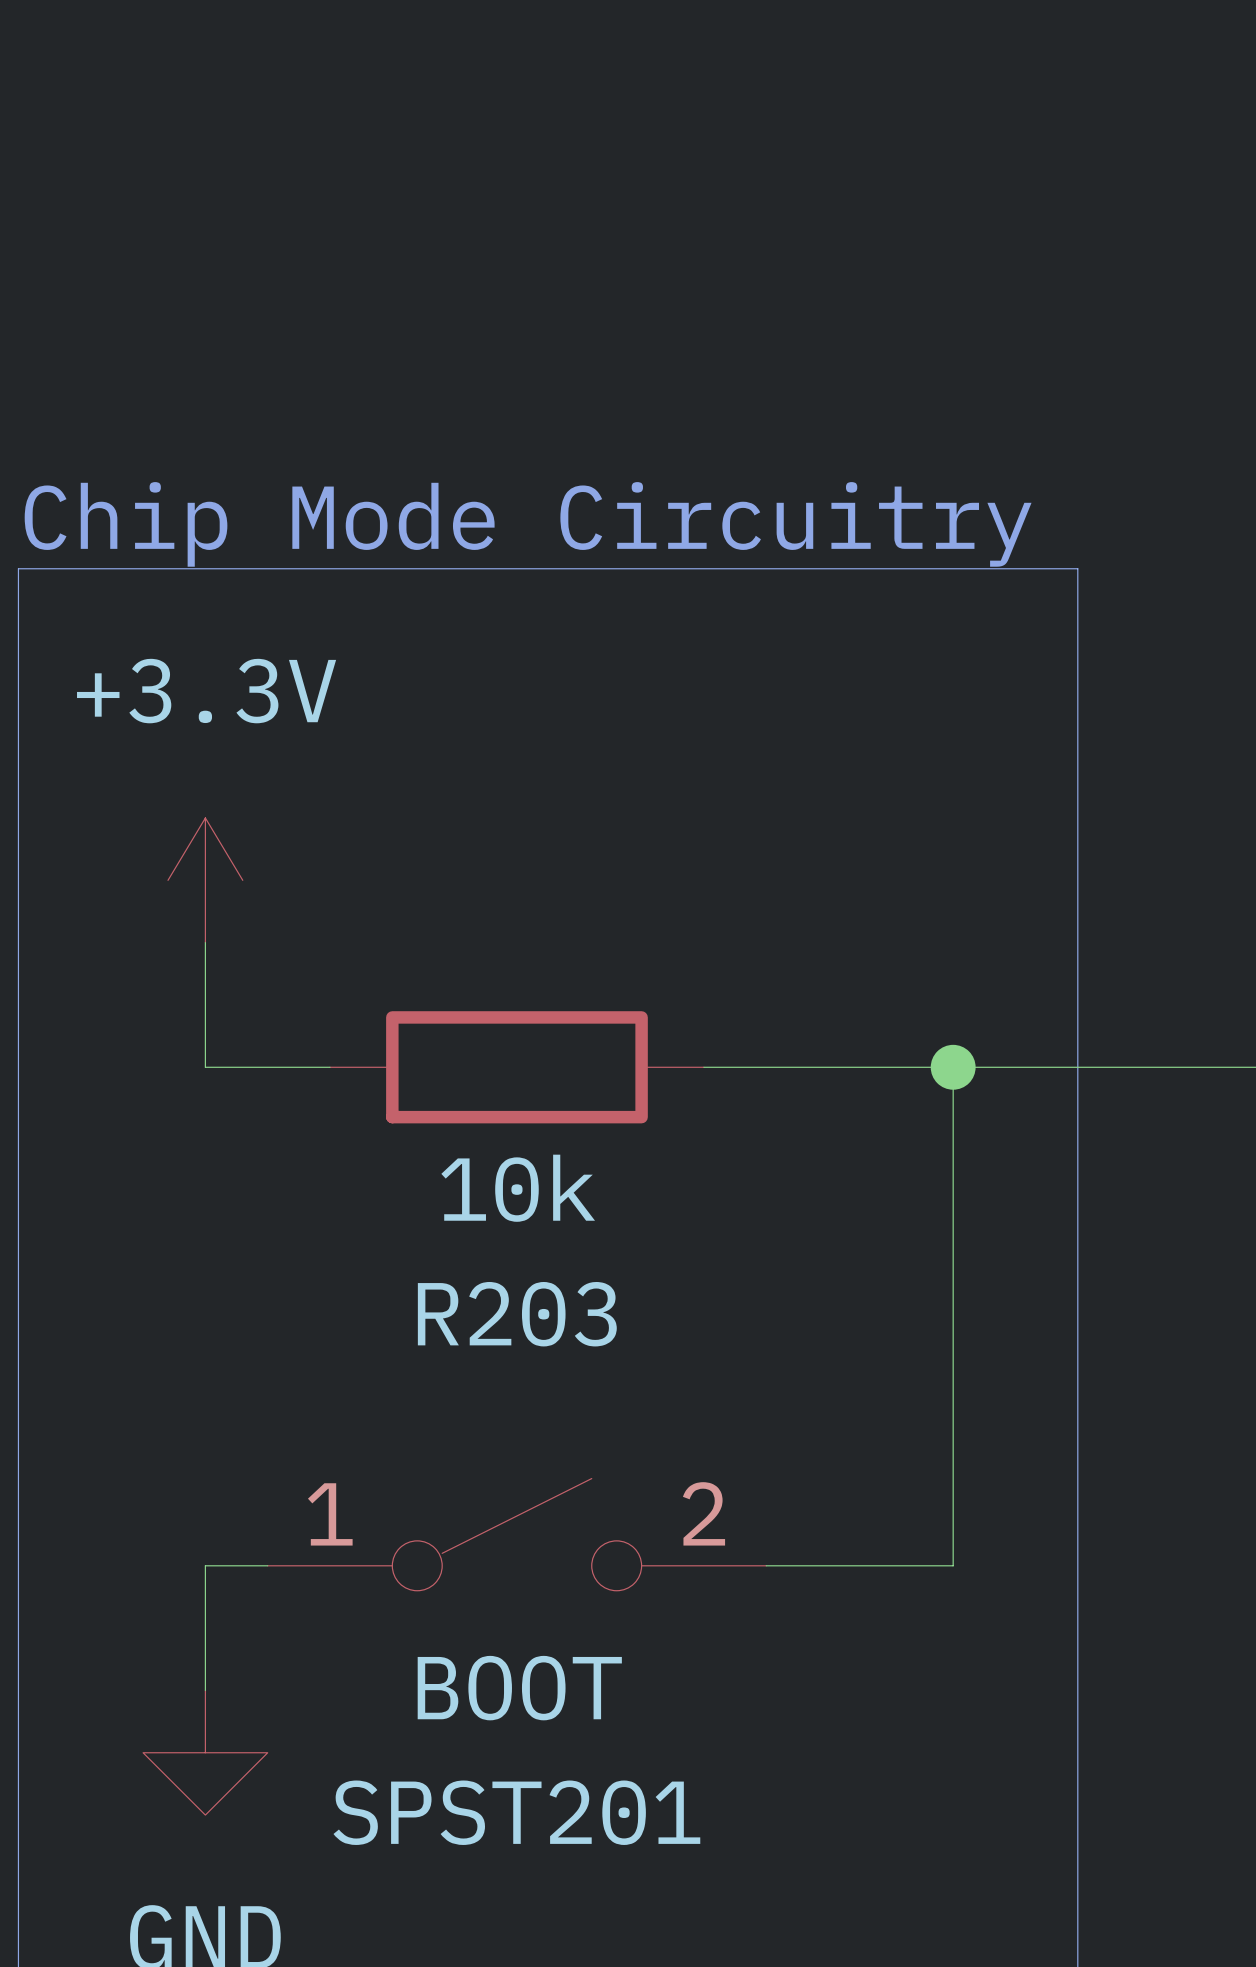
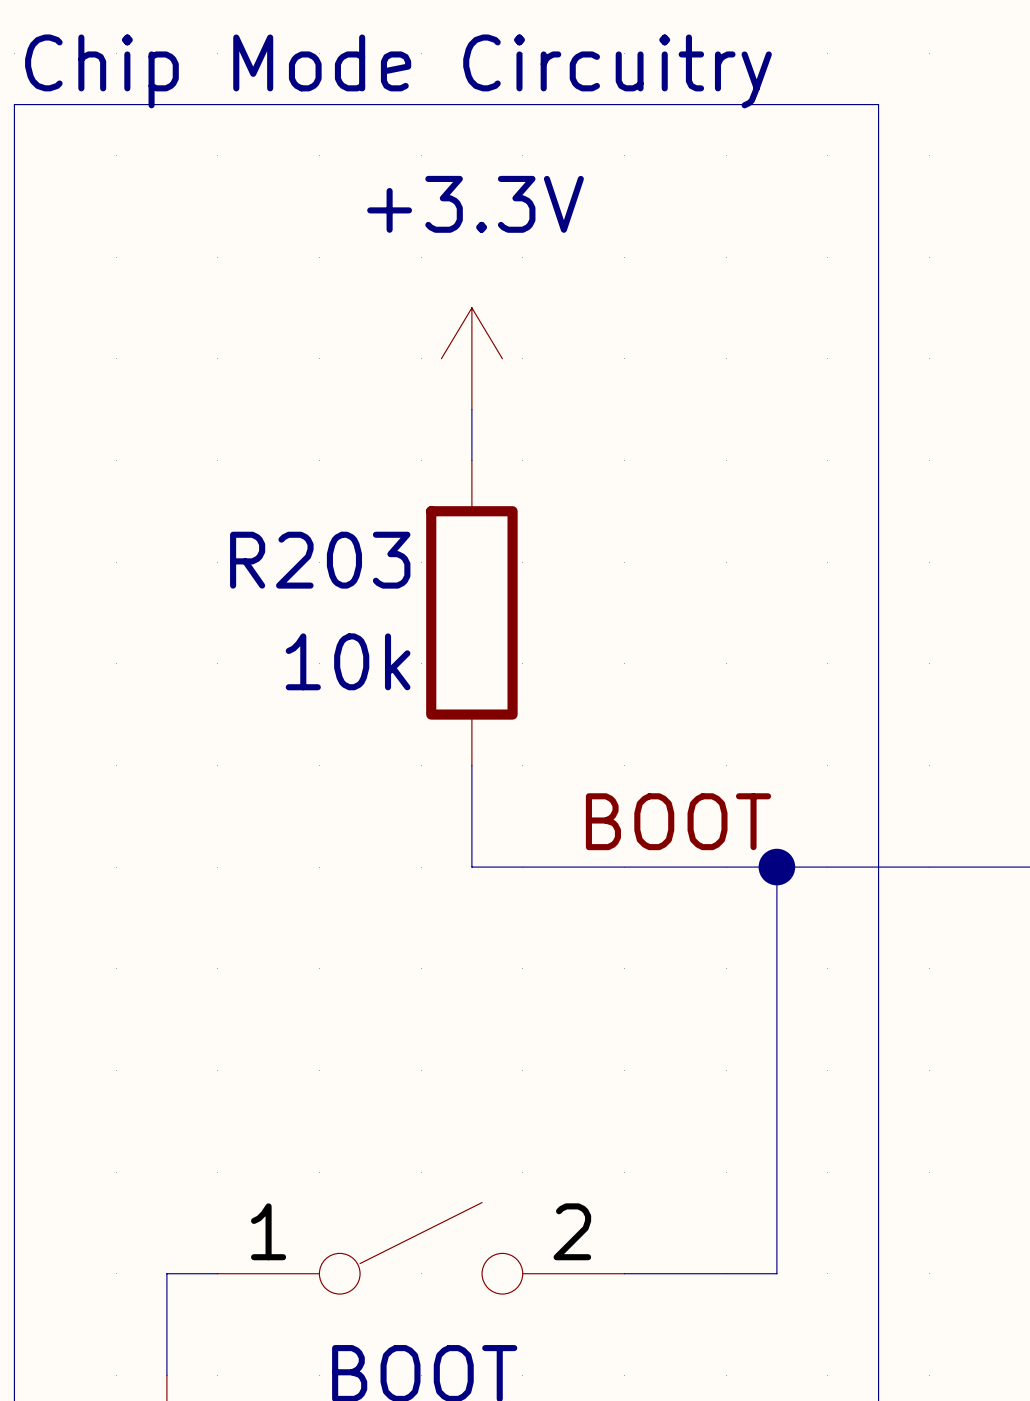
wire: none -> (471, 409) (471, 460)
text position: Chip Mode Circuitry (528, 524) -> Chip Mode Circuitry (398, 71)
line: (18, 568) (1077, 568) -> (14, 460) (14, 104) (878, 104) (878, 460)
power symbol position: +3.3V (205, 880) -> +3.3V (471, 358)
wire: (205, 942) (205, 1067) (330, 1067) -> (471, 765) (471, 867) (573, 867)
label: none -> BOOT (678, 821)
R203 rotation: 0° (516, 1067) -> 90° clockwise (471, 612)
R203 position: (516, 1067) -> (471, 612)

